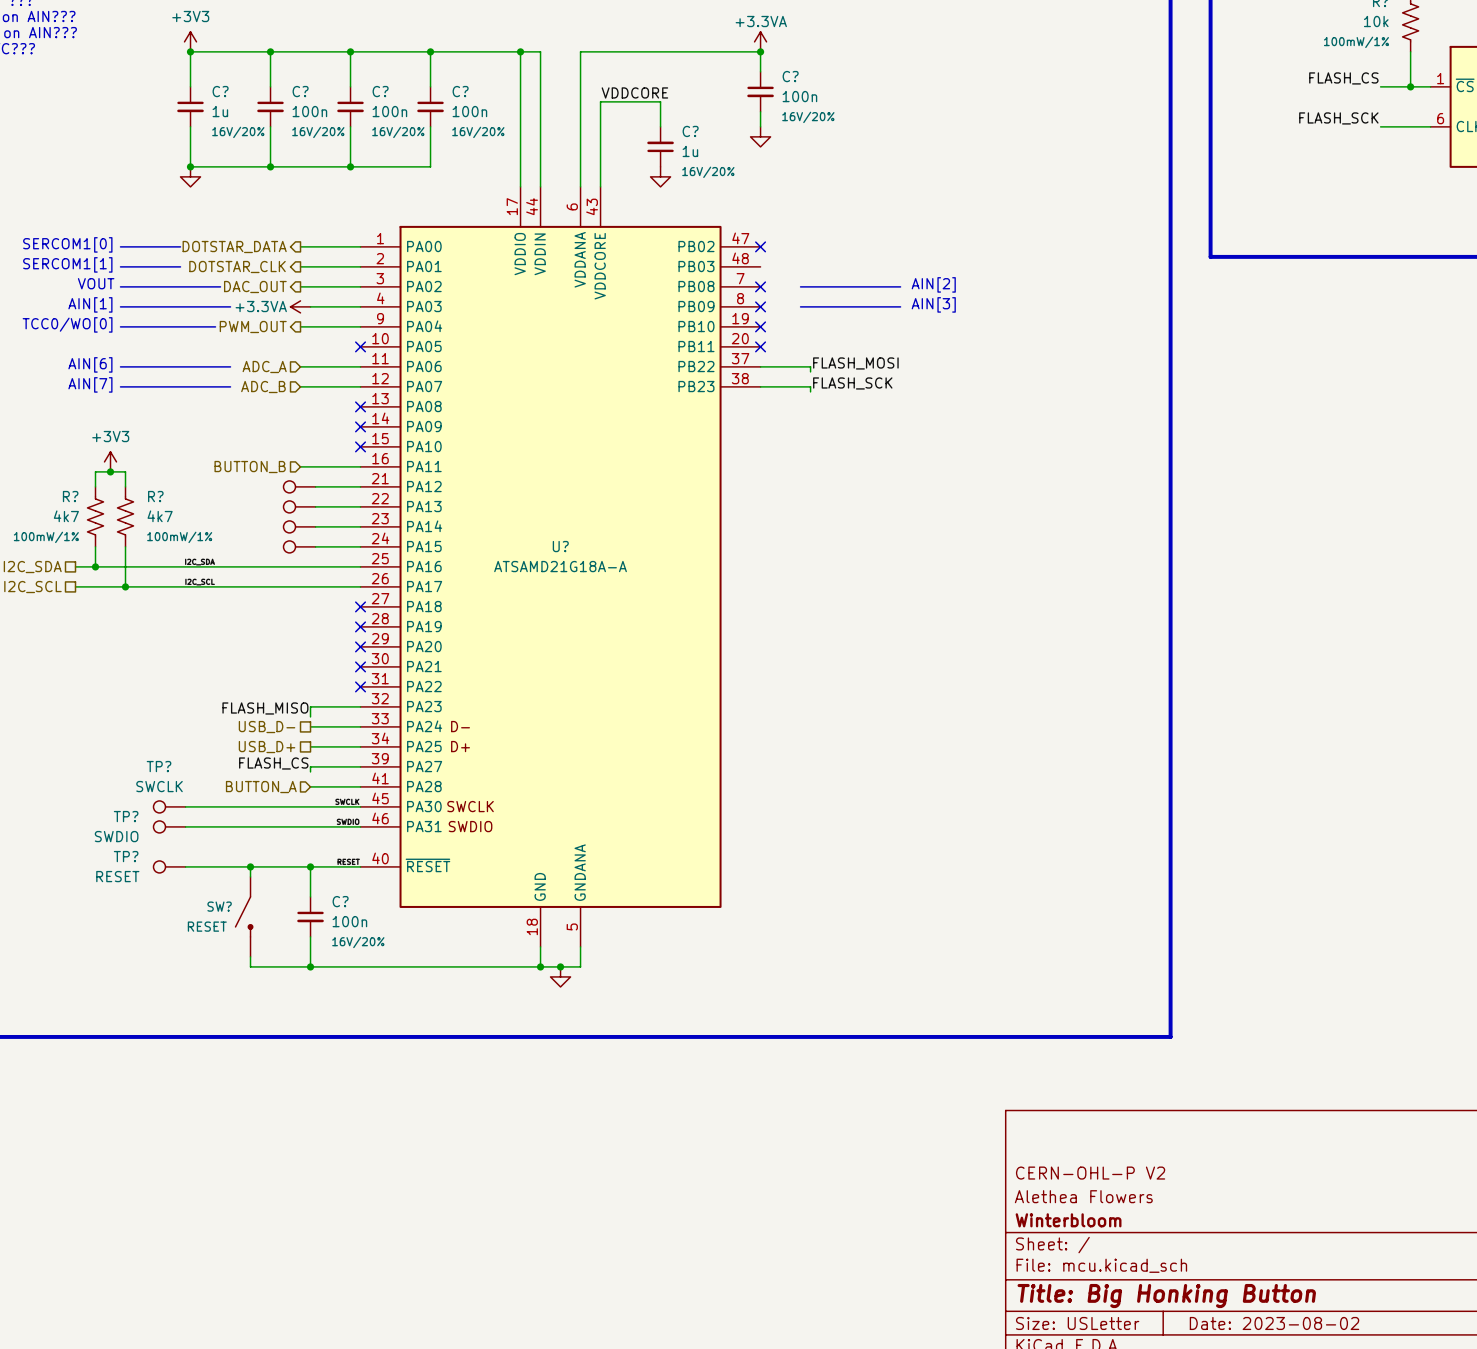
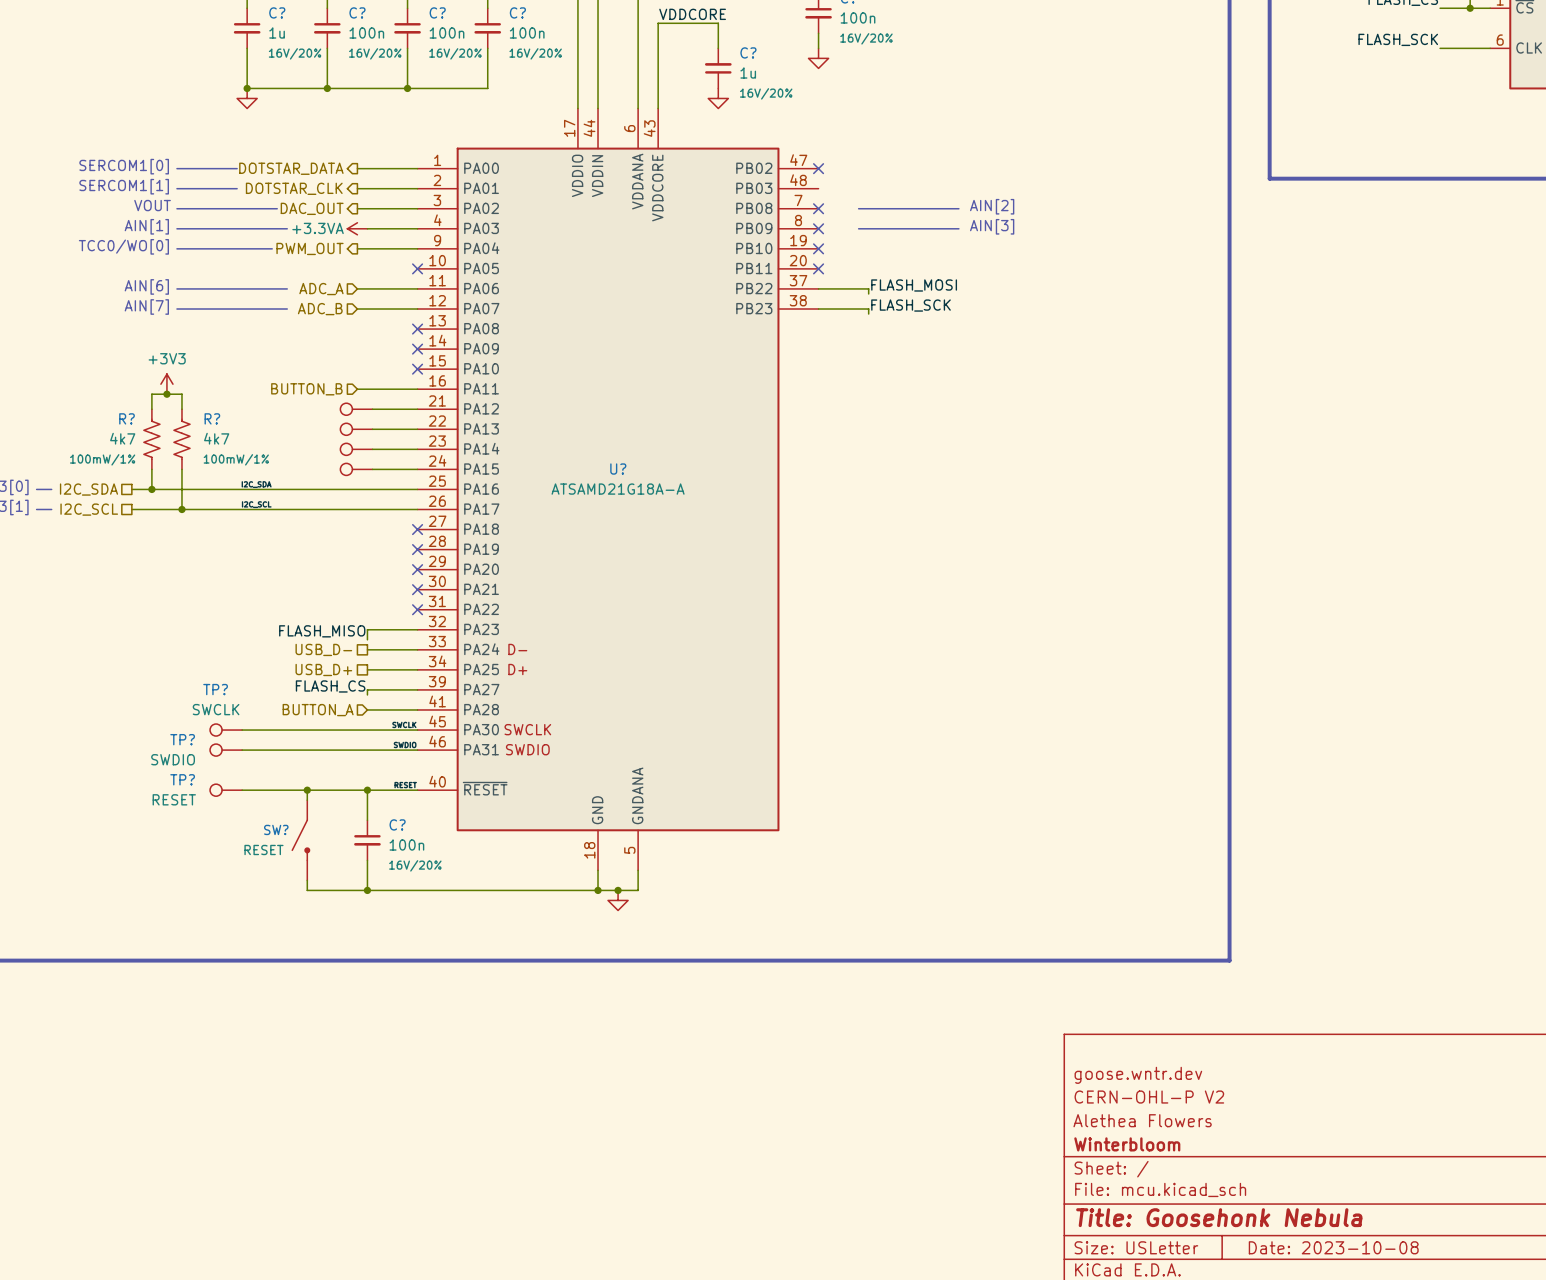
title block: none -> goose.wntr.dev (1138, 1075)
title block: Title: Big Honking Button (1166, 1296) -> Title: Goosehonk Nebula (1219, 1217)
title block: Date: 2023-08-02 (1274, 1323) -> Date: 2023-10-08 (1333, 1247)

